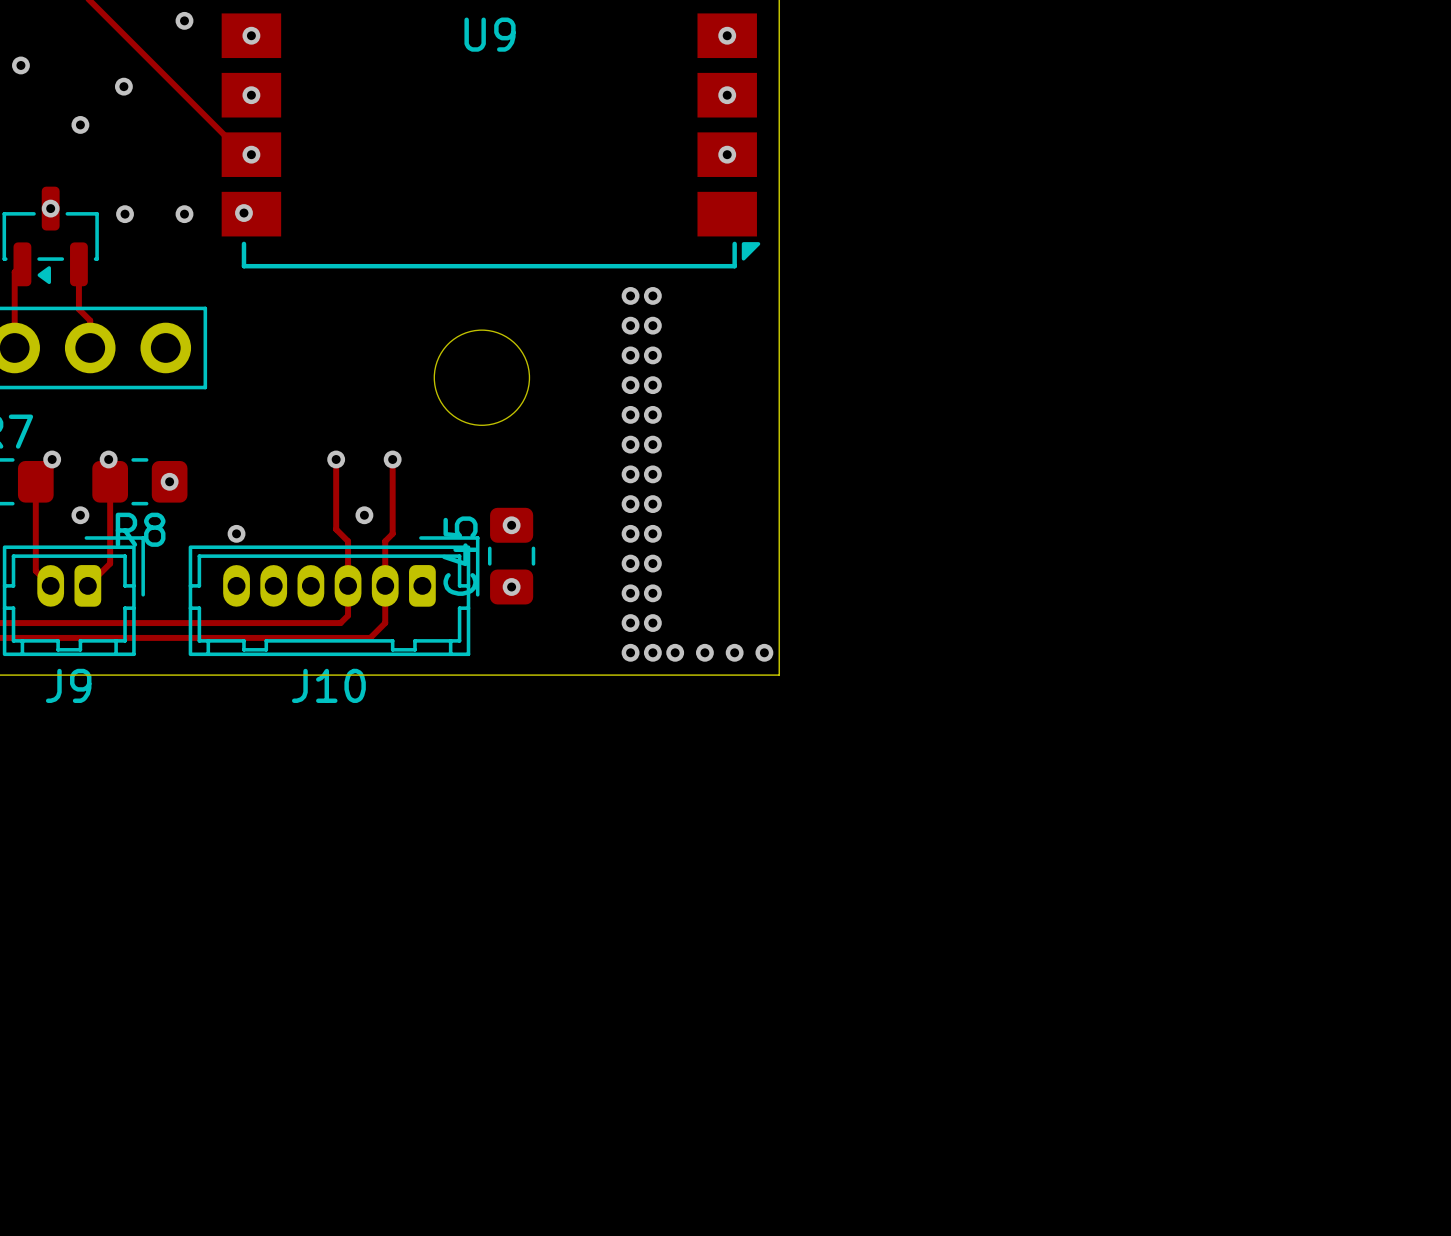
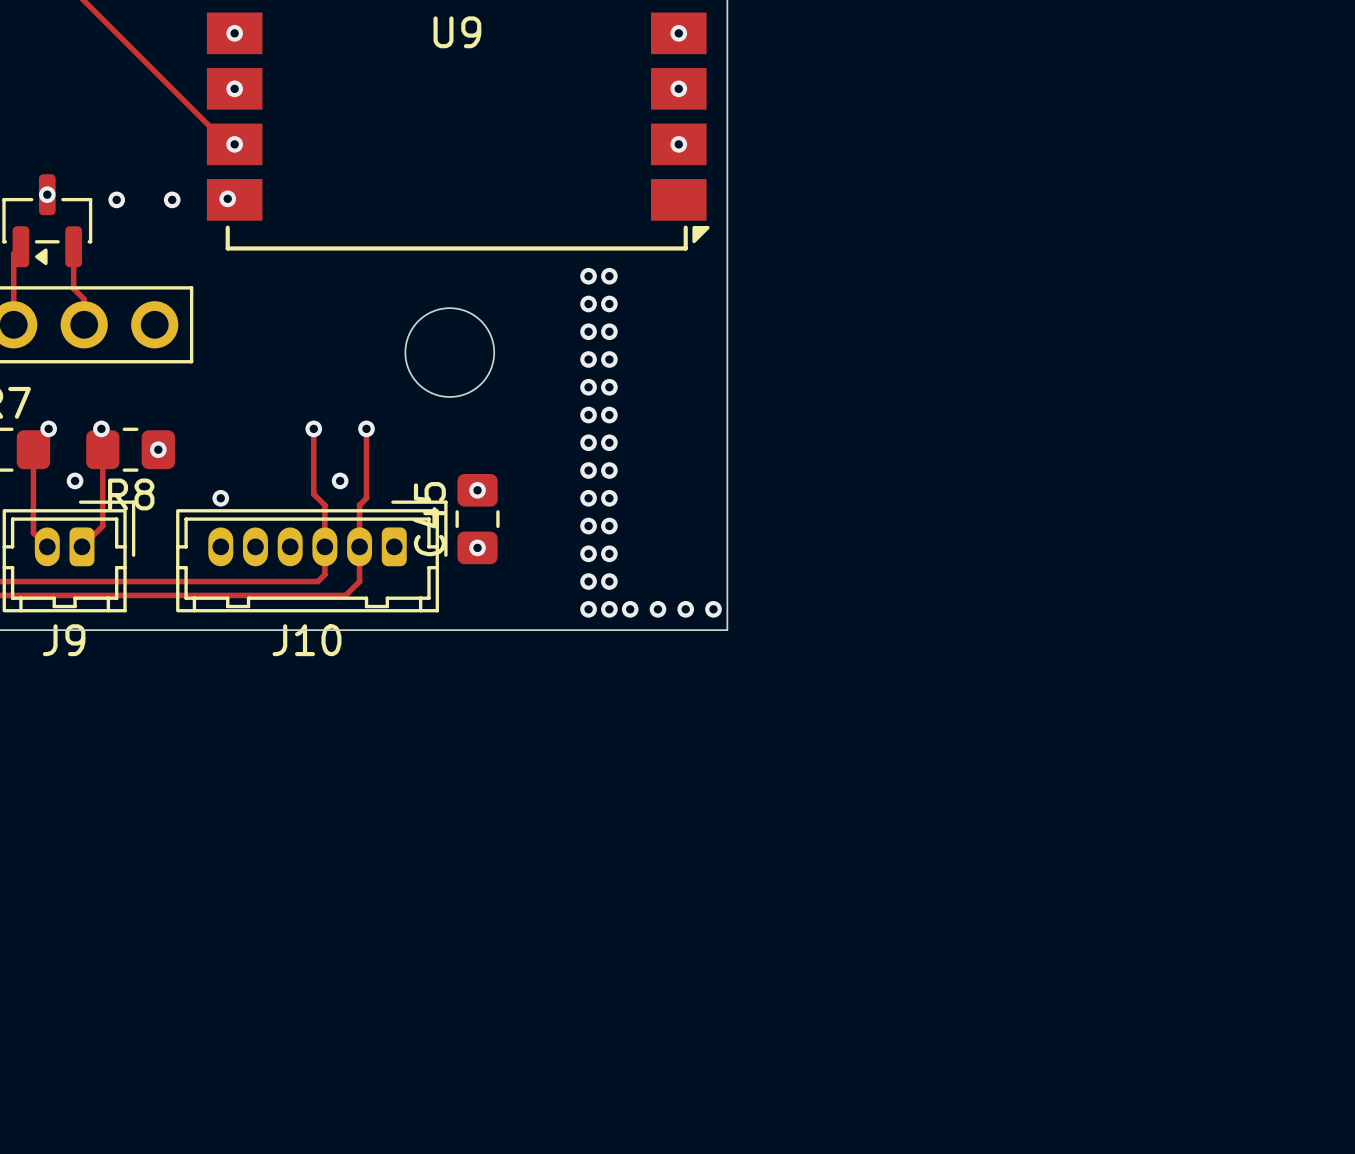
via: (184, 20) -> none
via: (20, 65) -> none
via: (123, 86) -> none
via: (80, 124) -> none

